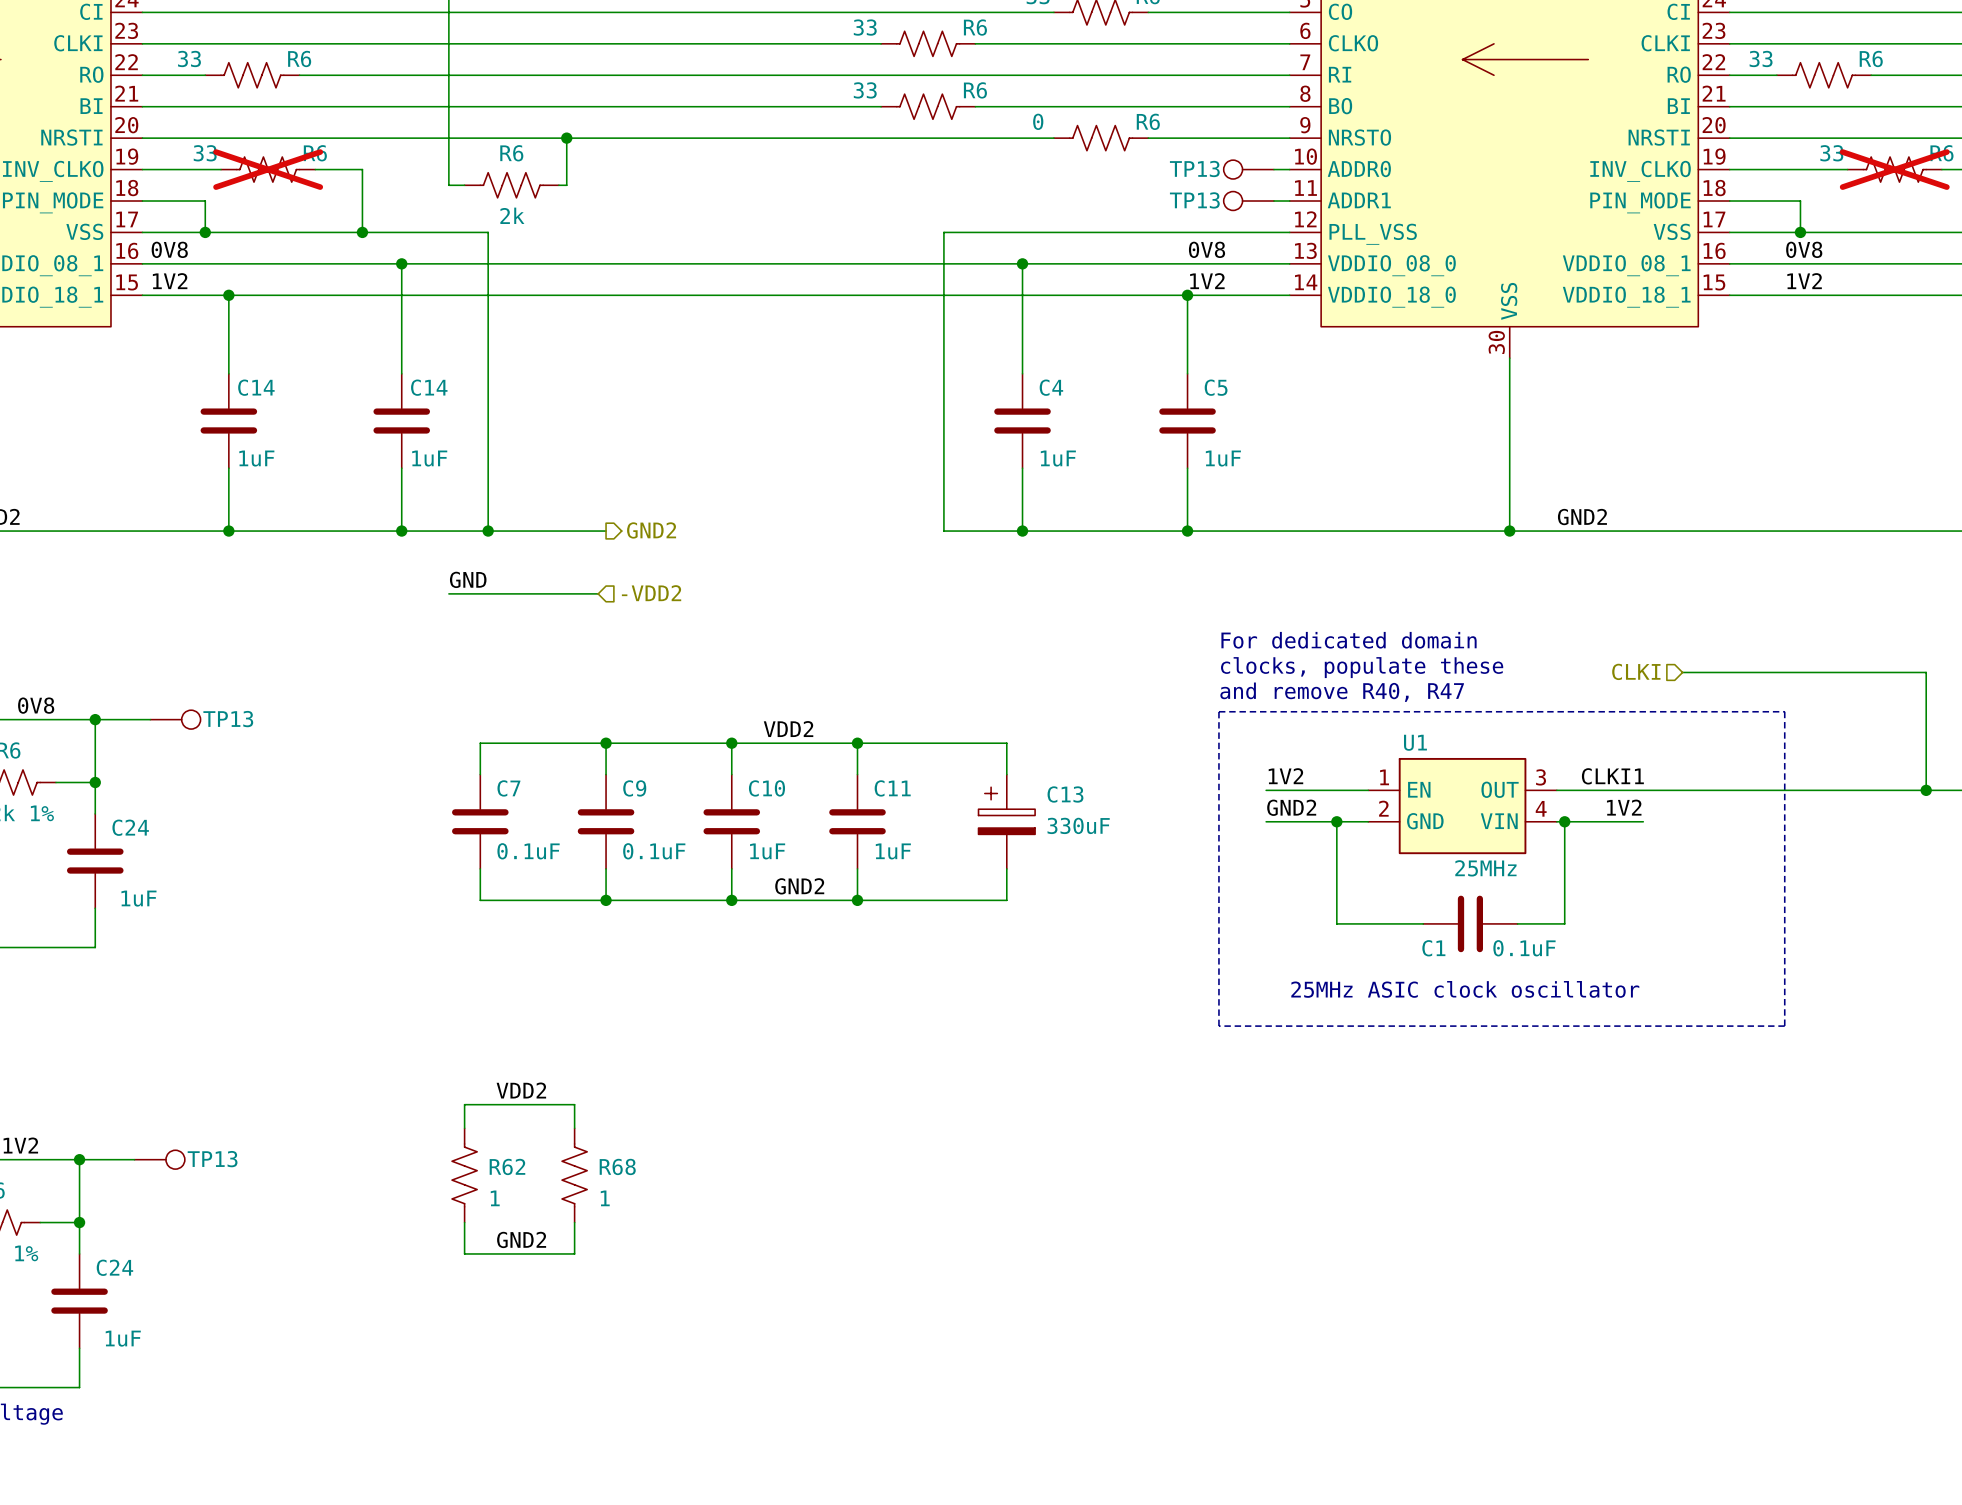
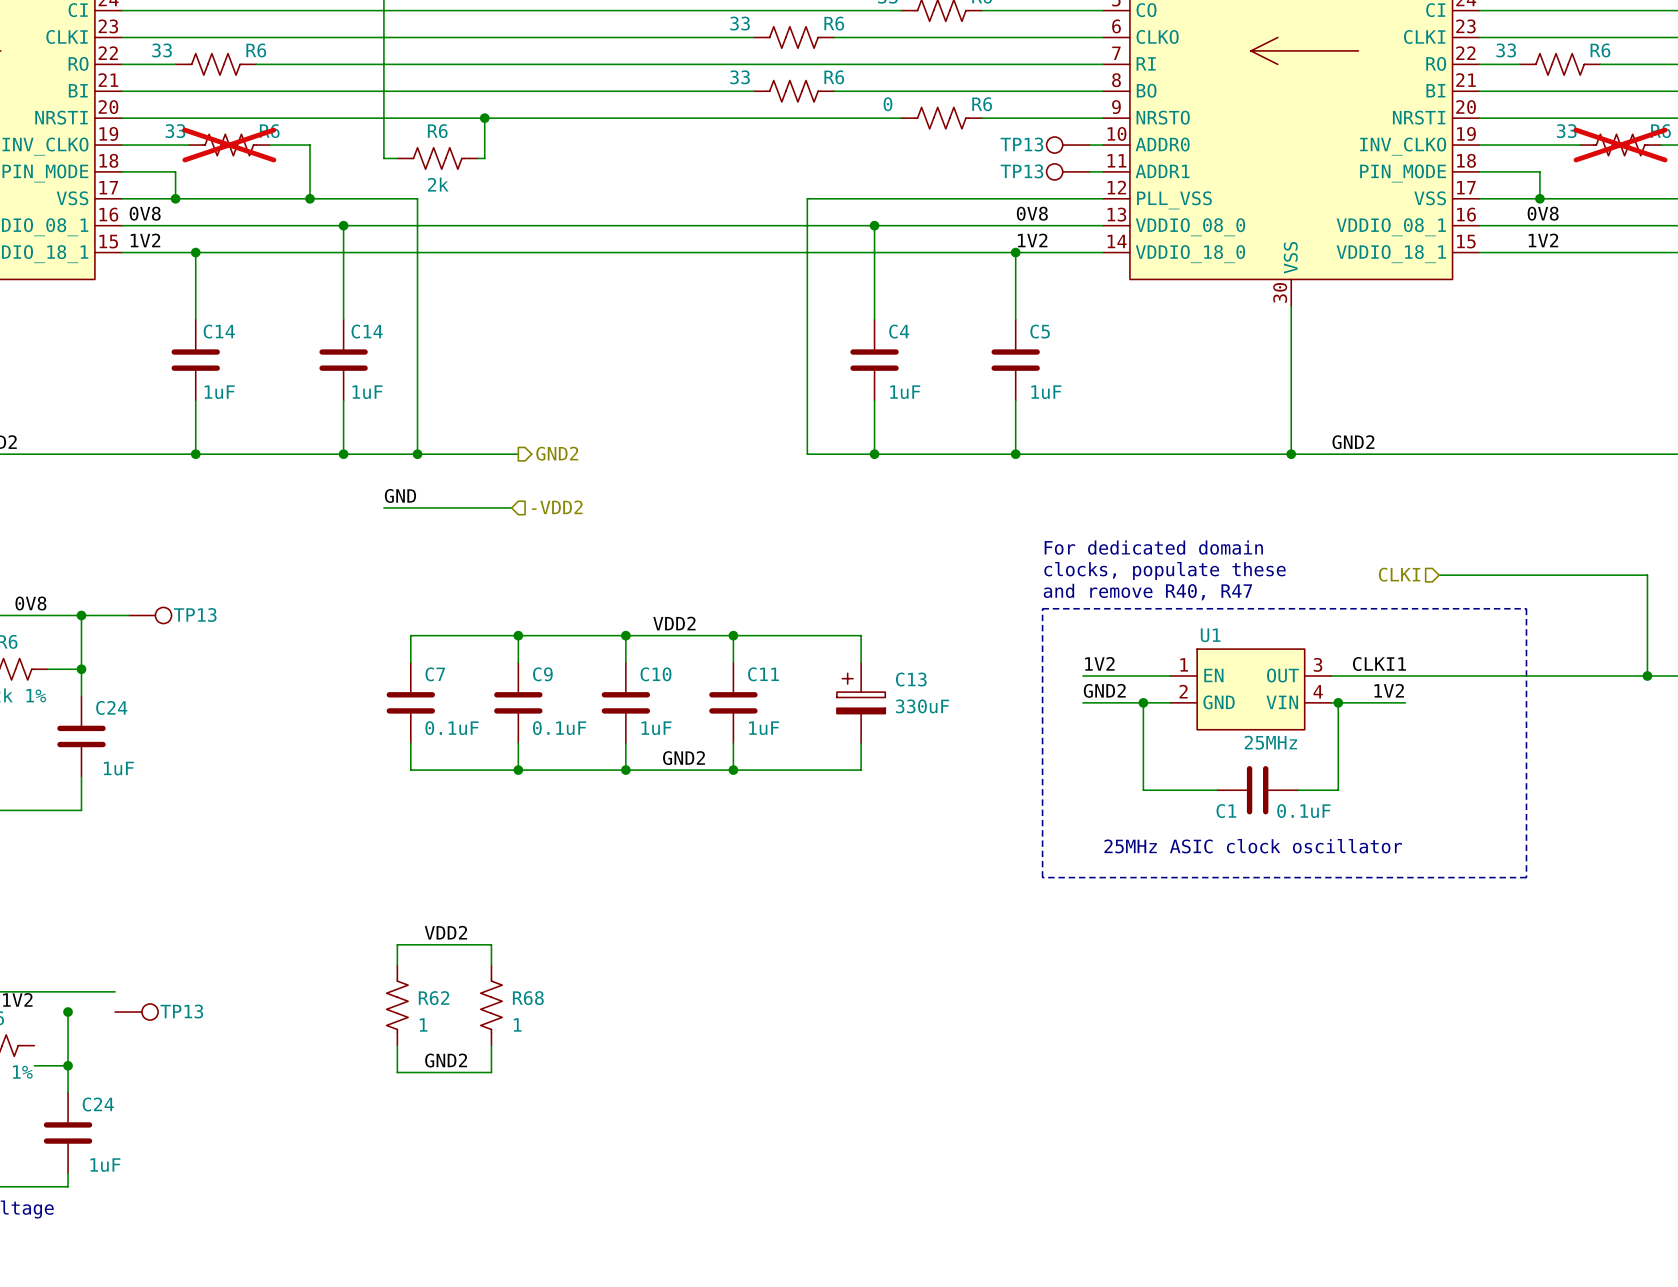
label position: 1V2 (20, 1145) -> 1V2 (17, 999)
wire: (79, 1159) (79, 1183) -> none
junction: (79, 1159) -> none
TP13 position: (159, 1159) -> (136, 1012)
junction: none -> (68, 1012)
wire: (40, 1222) (79, 1222) -> (34, 1065) (68, 1065)
junction: (79, 1222) -> none
junction: none -> (68, 1065)
C24 position: (79, 1301) -> (68, 1133)

